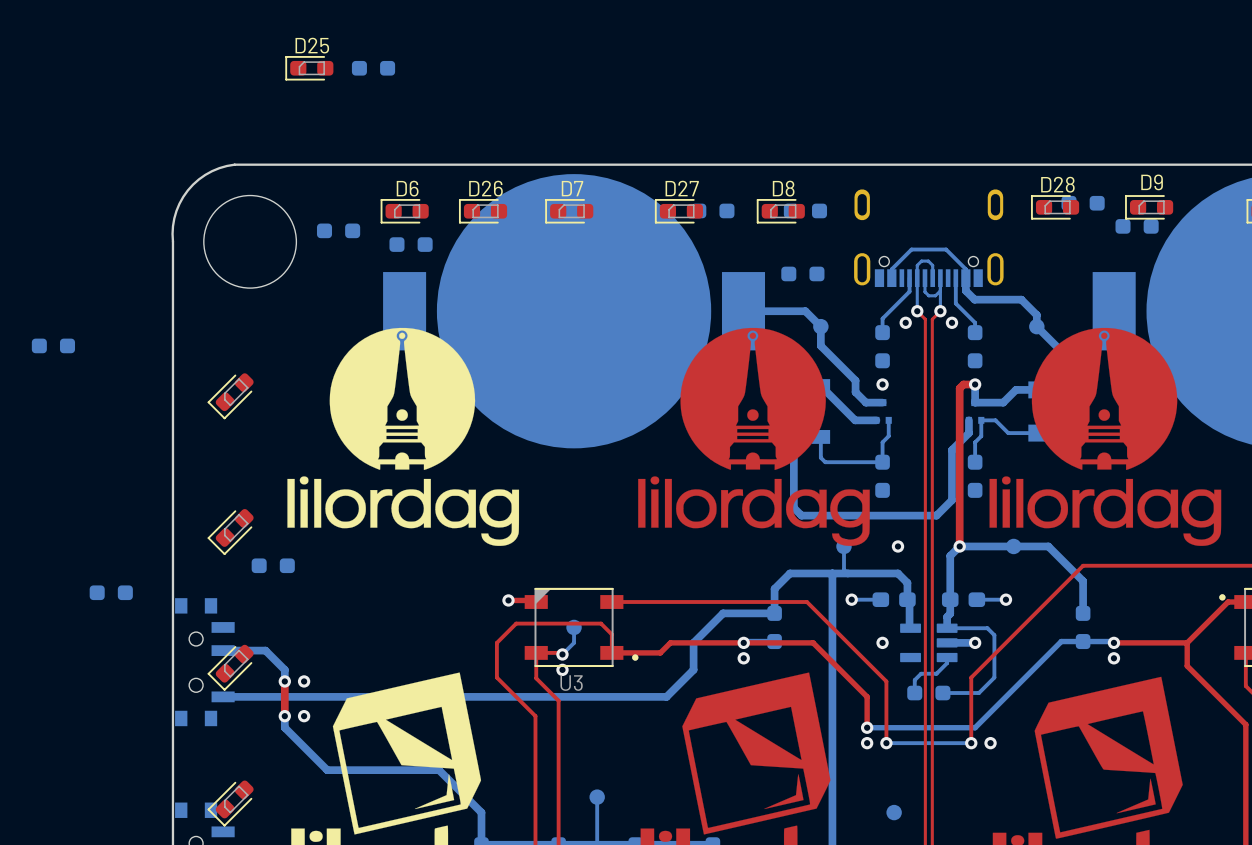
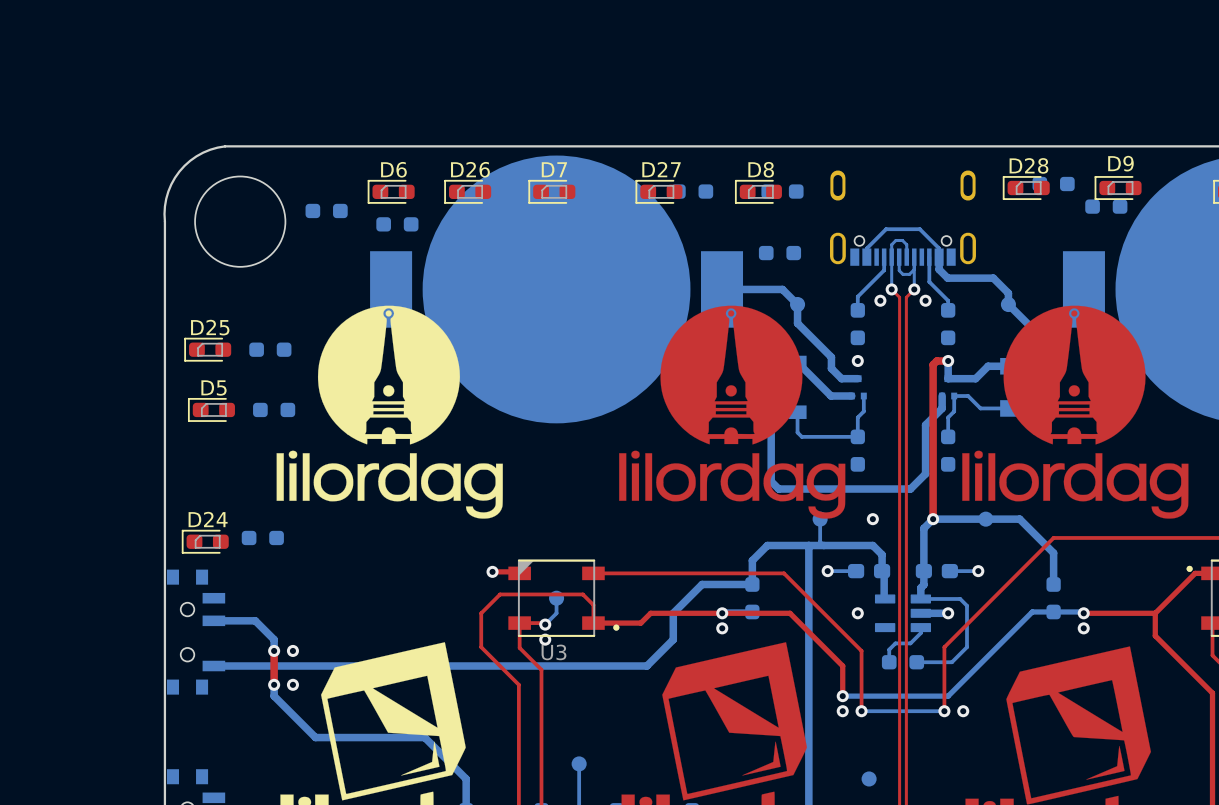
D25 position: (309, 68) -> (207, 349)
part: (373, 68) -> none
part: (53, 345) -> none
part: none -> (270, 349)
part: (230, 396) -> none
D5: none -> (211, 409)
part: none -> (274, 409)
part: (230, 532) -> none
D24: none -> (205, 541)
part: (111, 592) -> none
part: (230, 667) -> none
part: (230, 803) -> none

